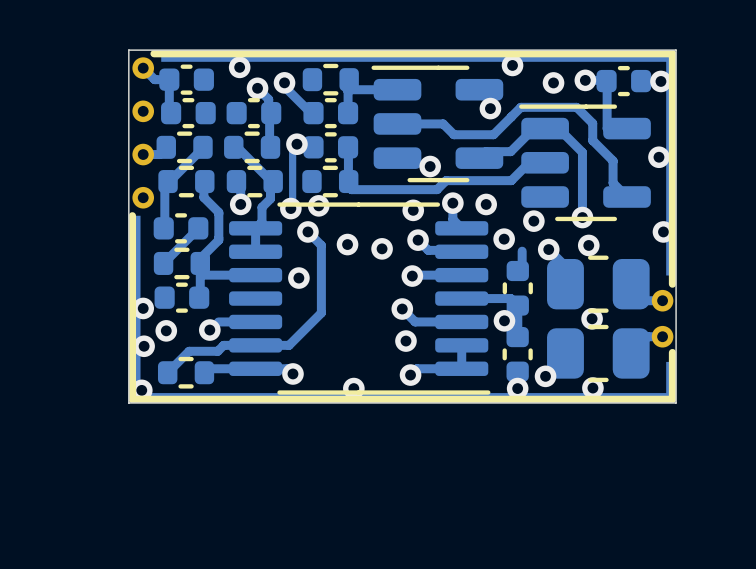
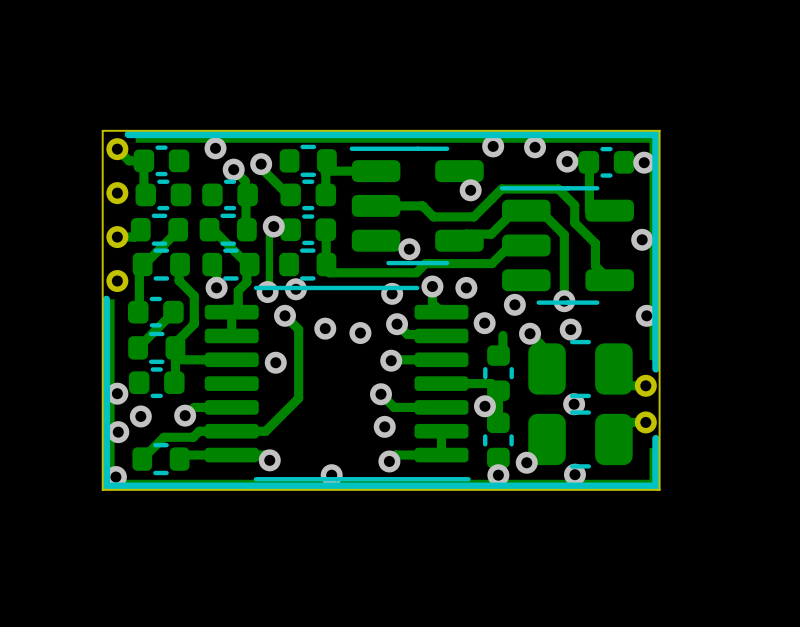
via position: (553, 82) -> (535, 147)

